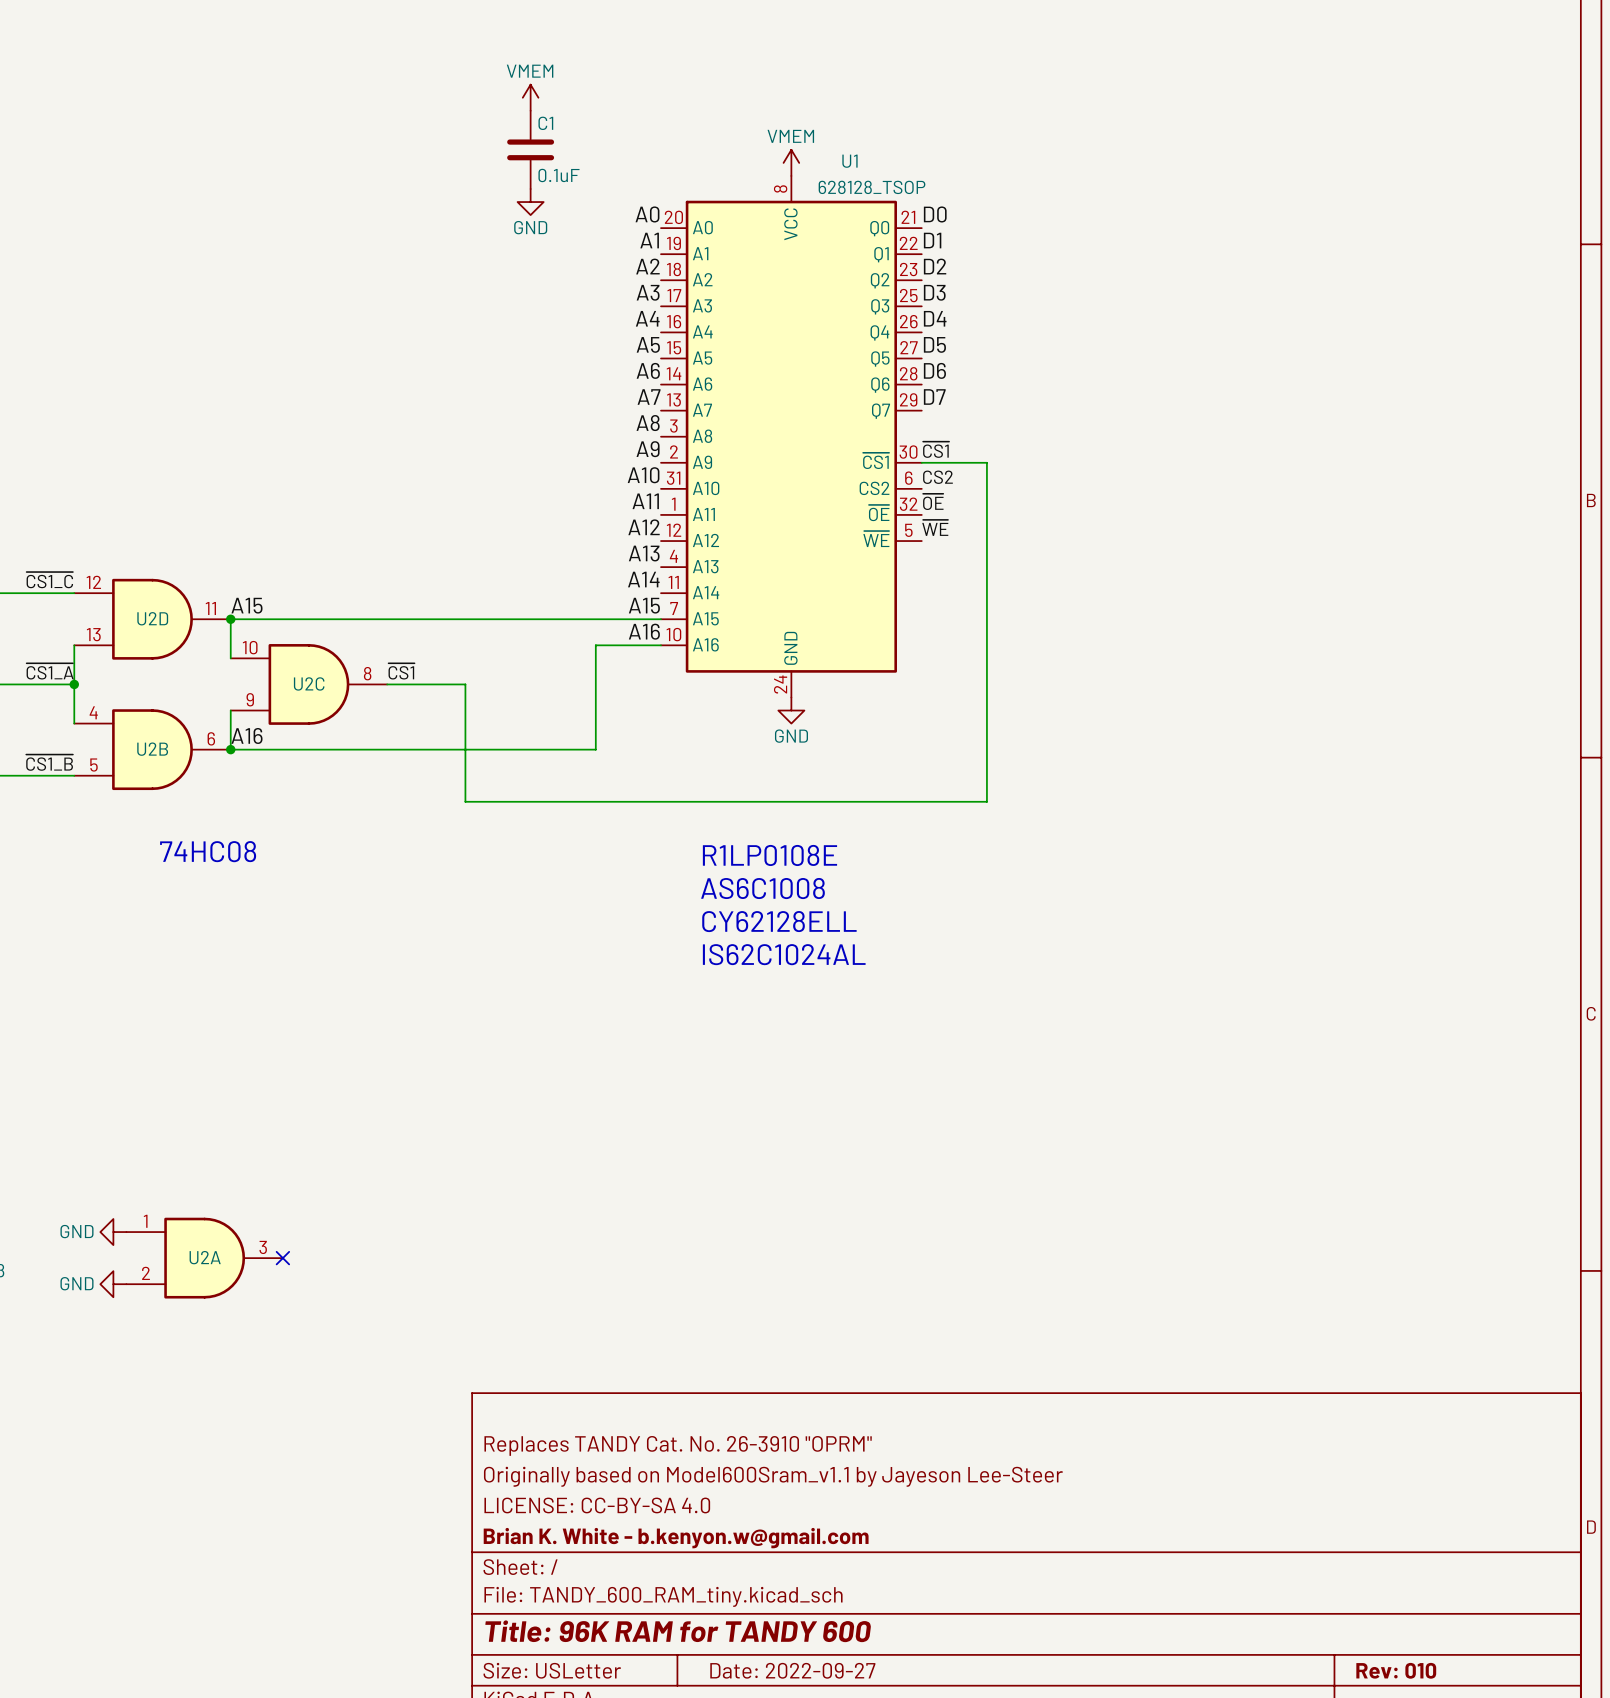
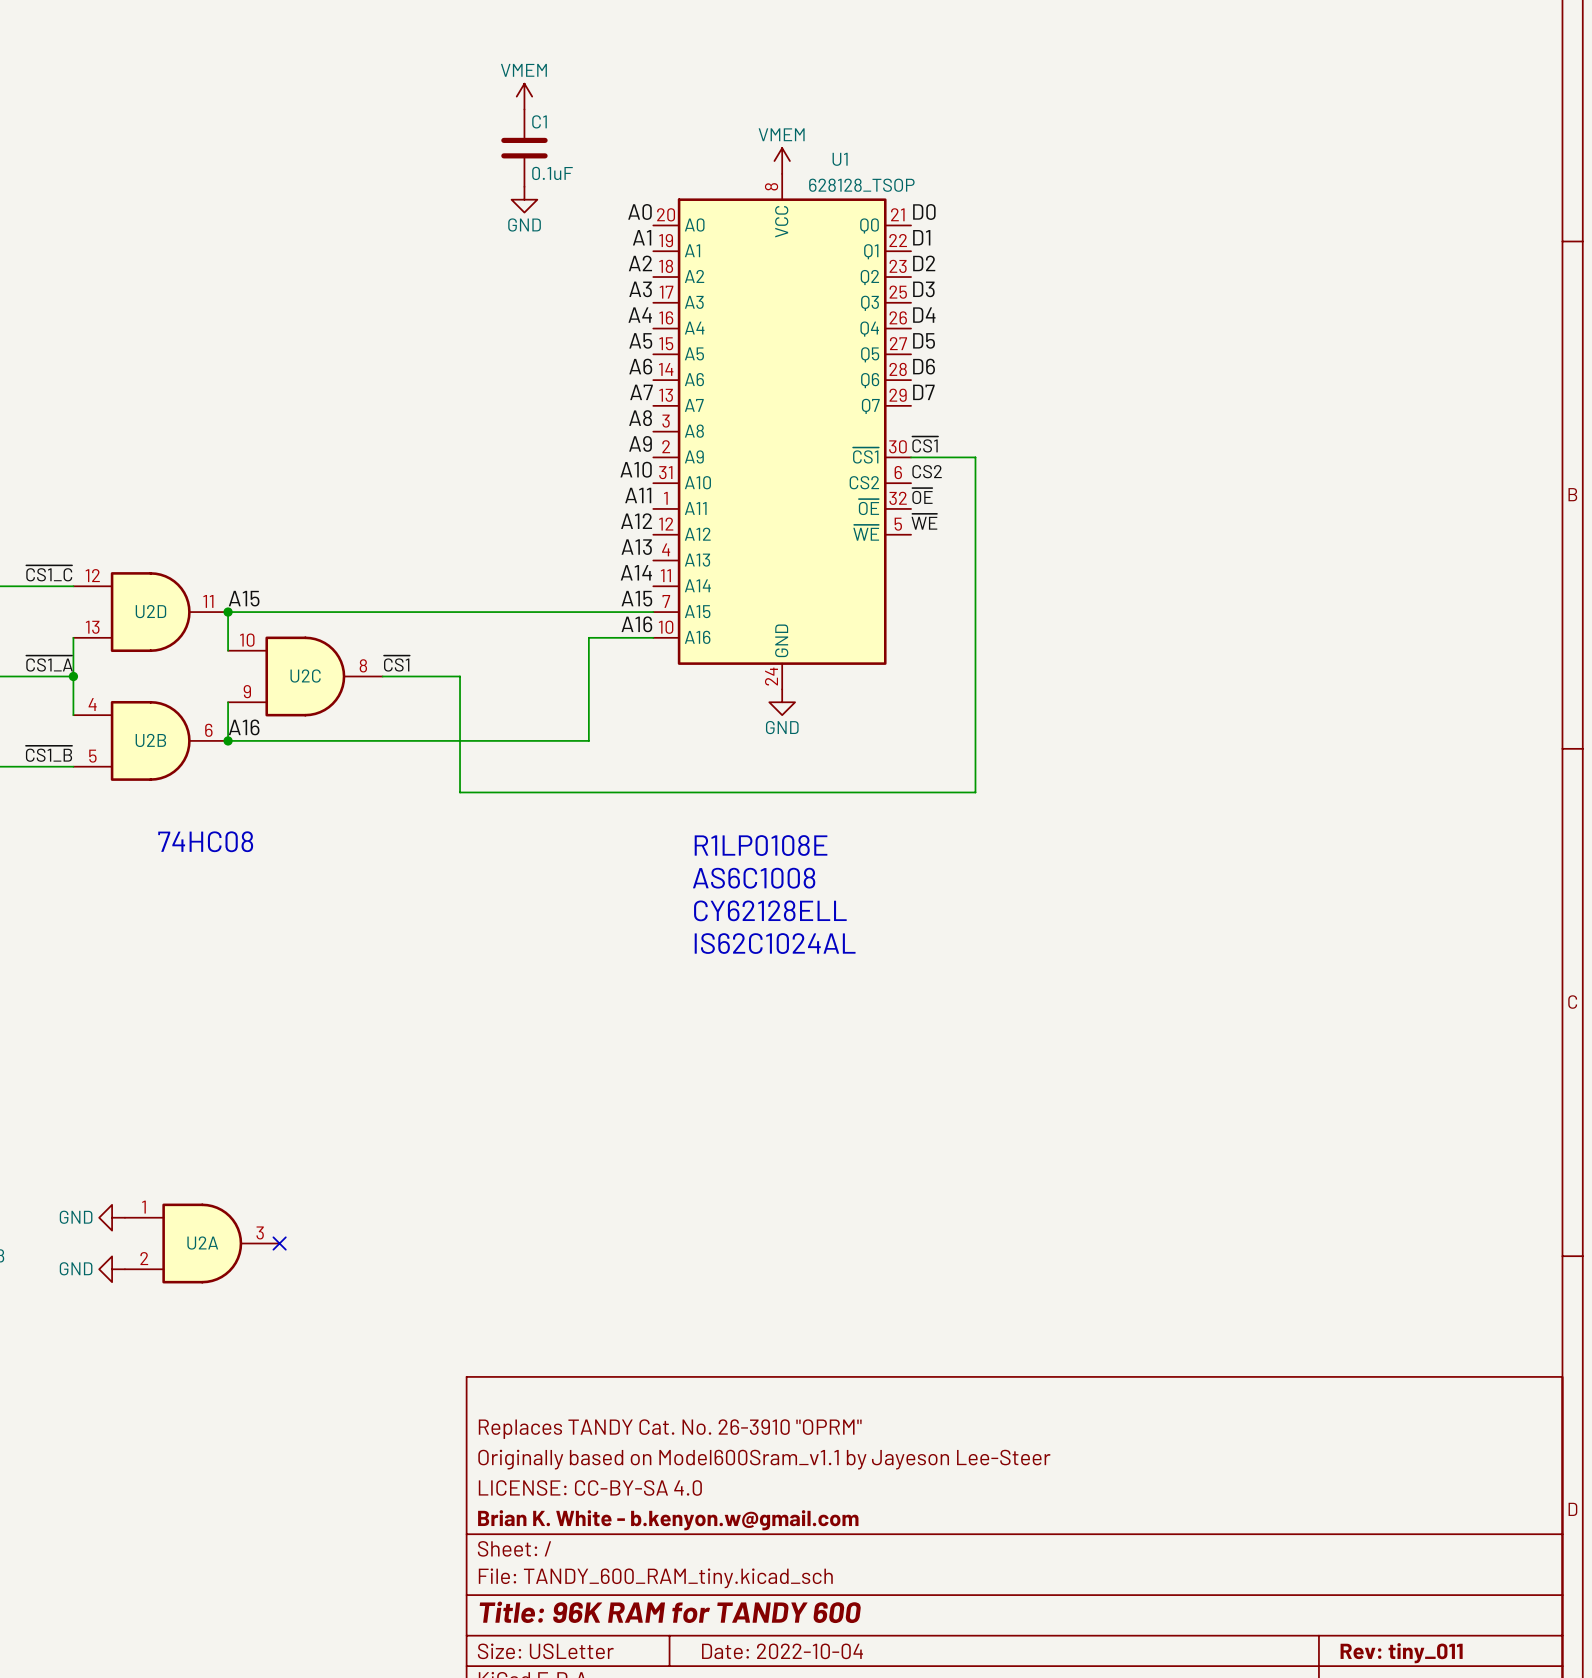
title block: Date: 2022-09-27 (792, 1670) -> Date: 2022-10-04 (782, 1651)
title block: Rev: 010 (1396, 1670) -> Rev: tiny_011 (1401, 1653)

